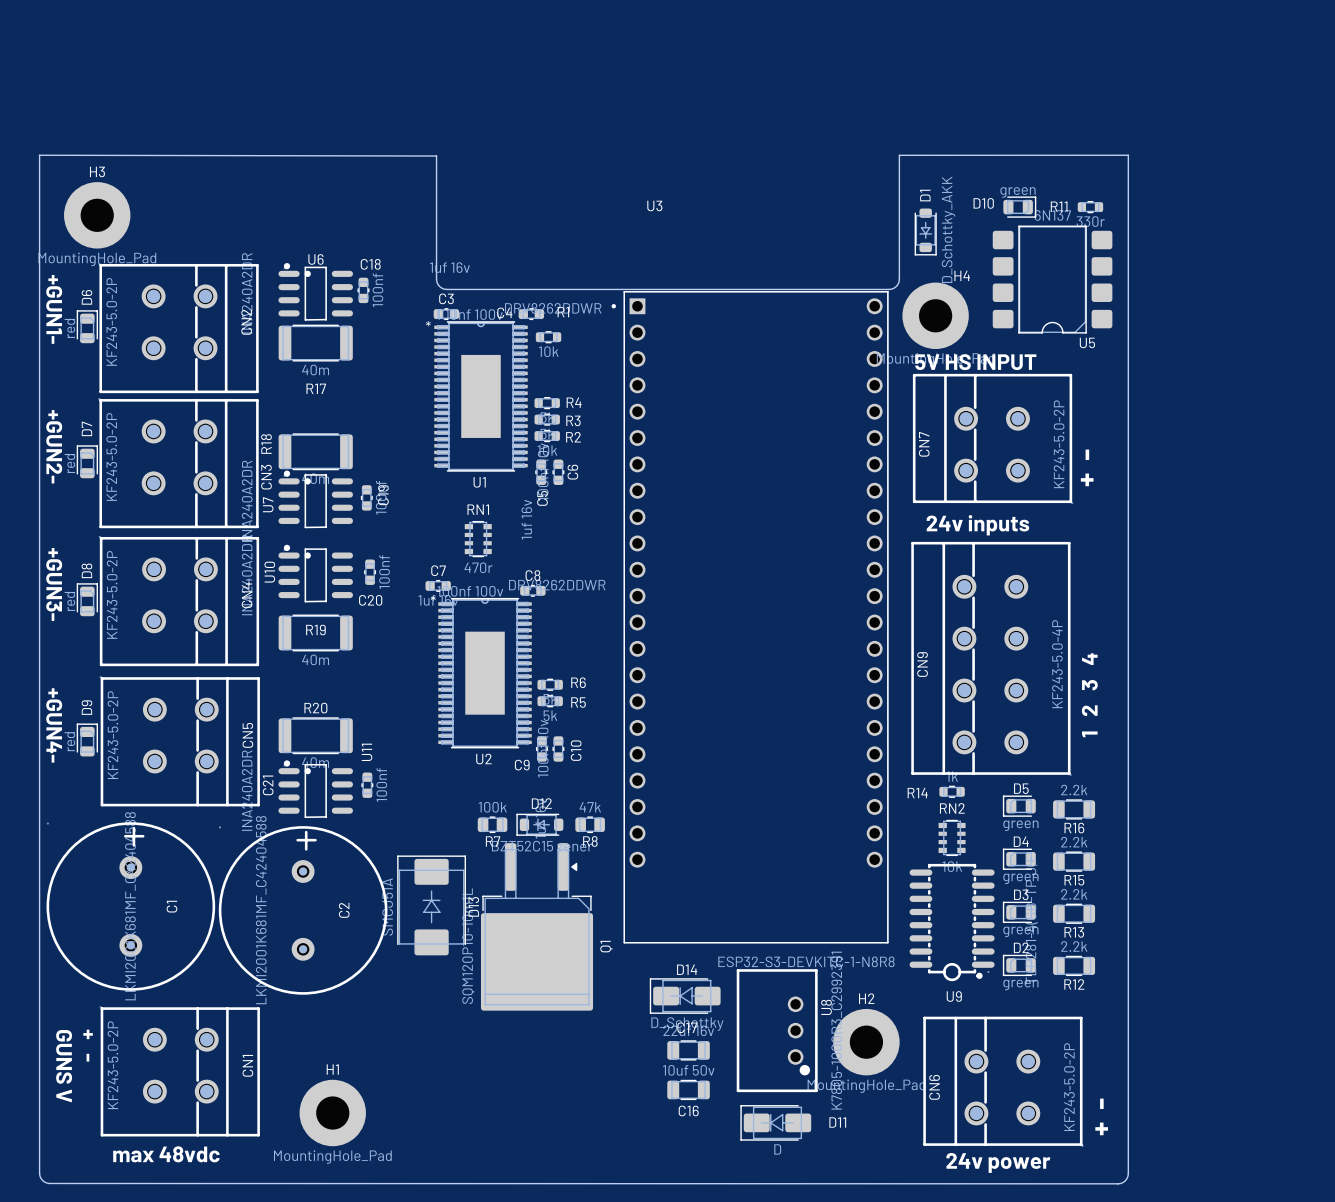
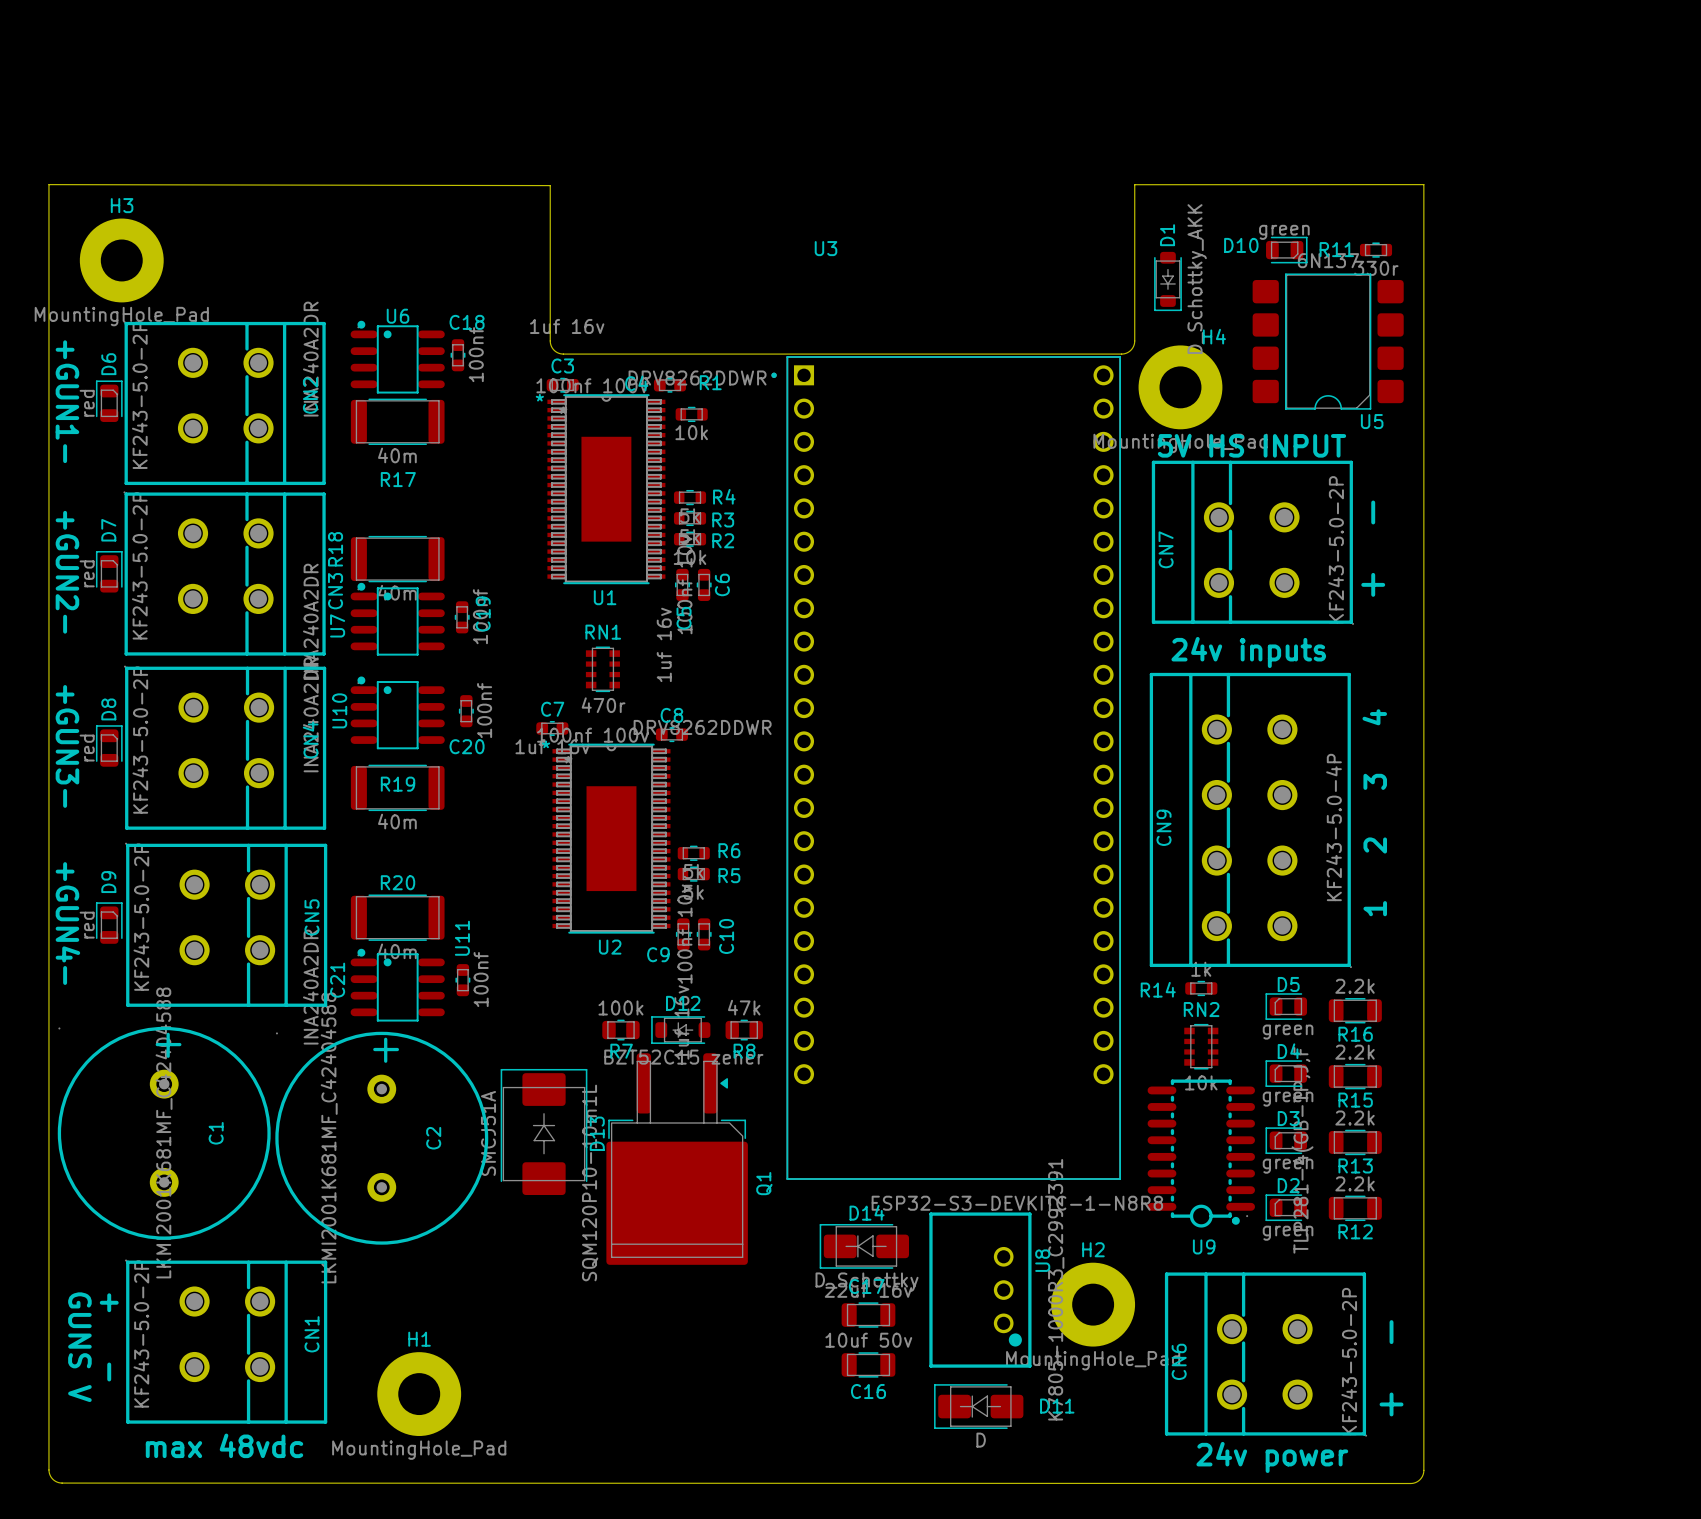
U6 footprint: [278, 263, 354, 321] -> [350, 320, 445, 394]
U7 footprint: [278, 470, 354, 529] -> [350, 582, 445, 656]
U10 footprint: [278, 544, 354, 603] -> [350, 676, 445, 750]
U11 footprint: [278, 760, 354, 819] -> [350, 948, 445, 1022]

